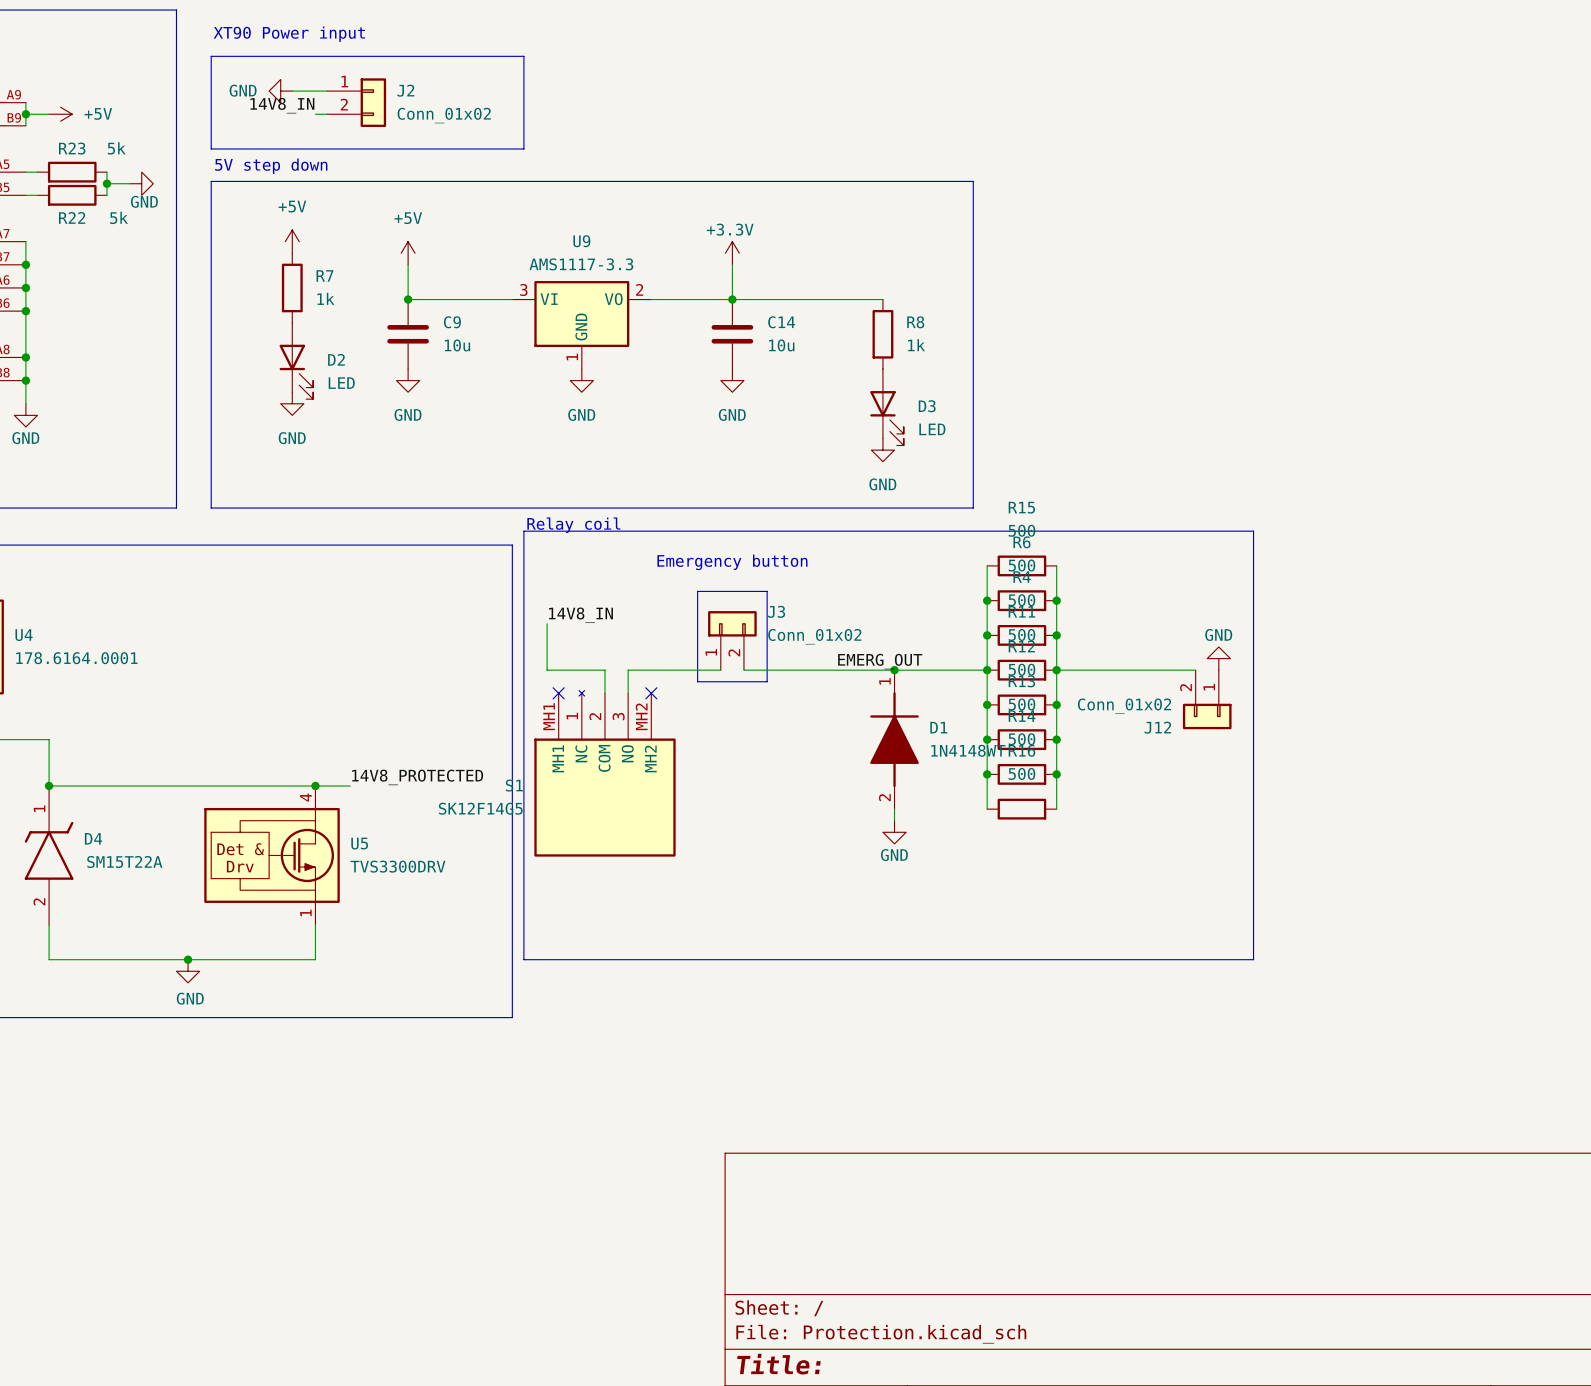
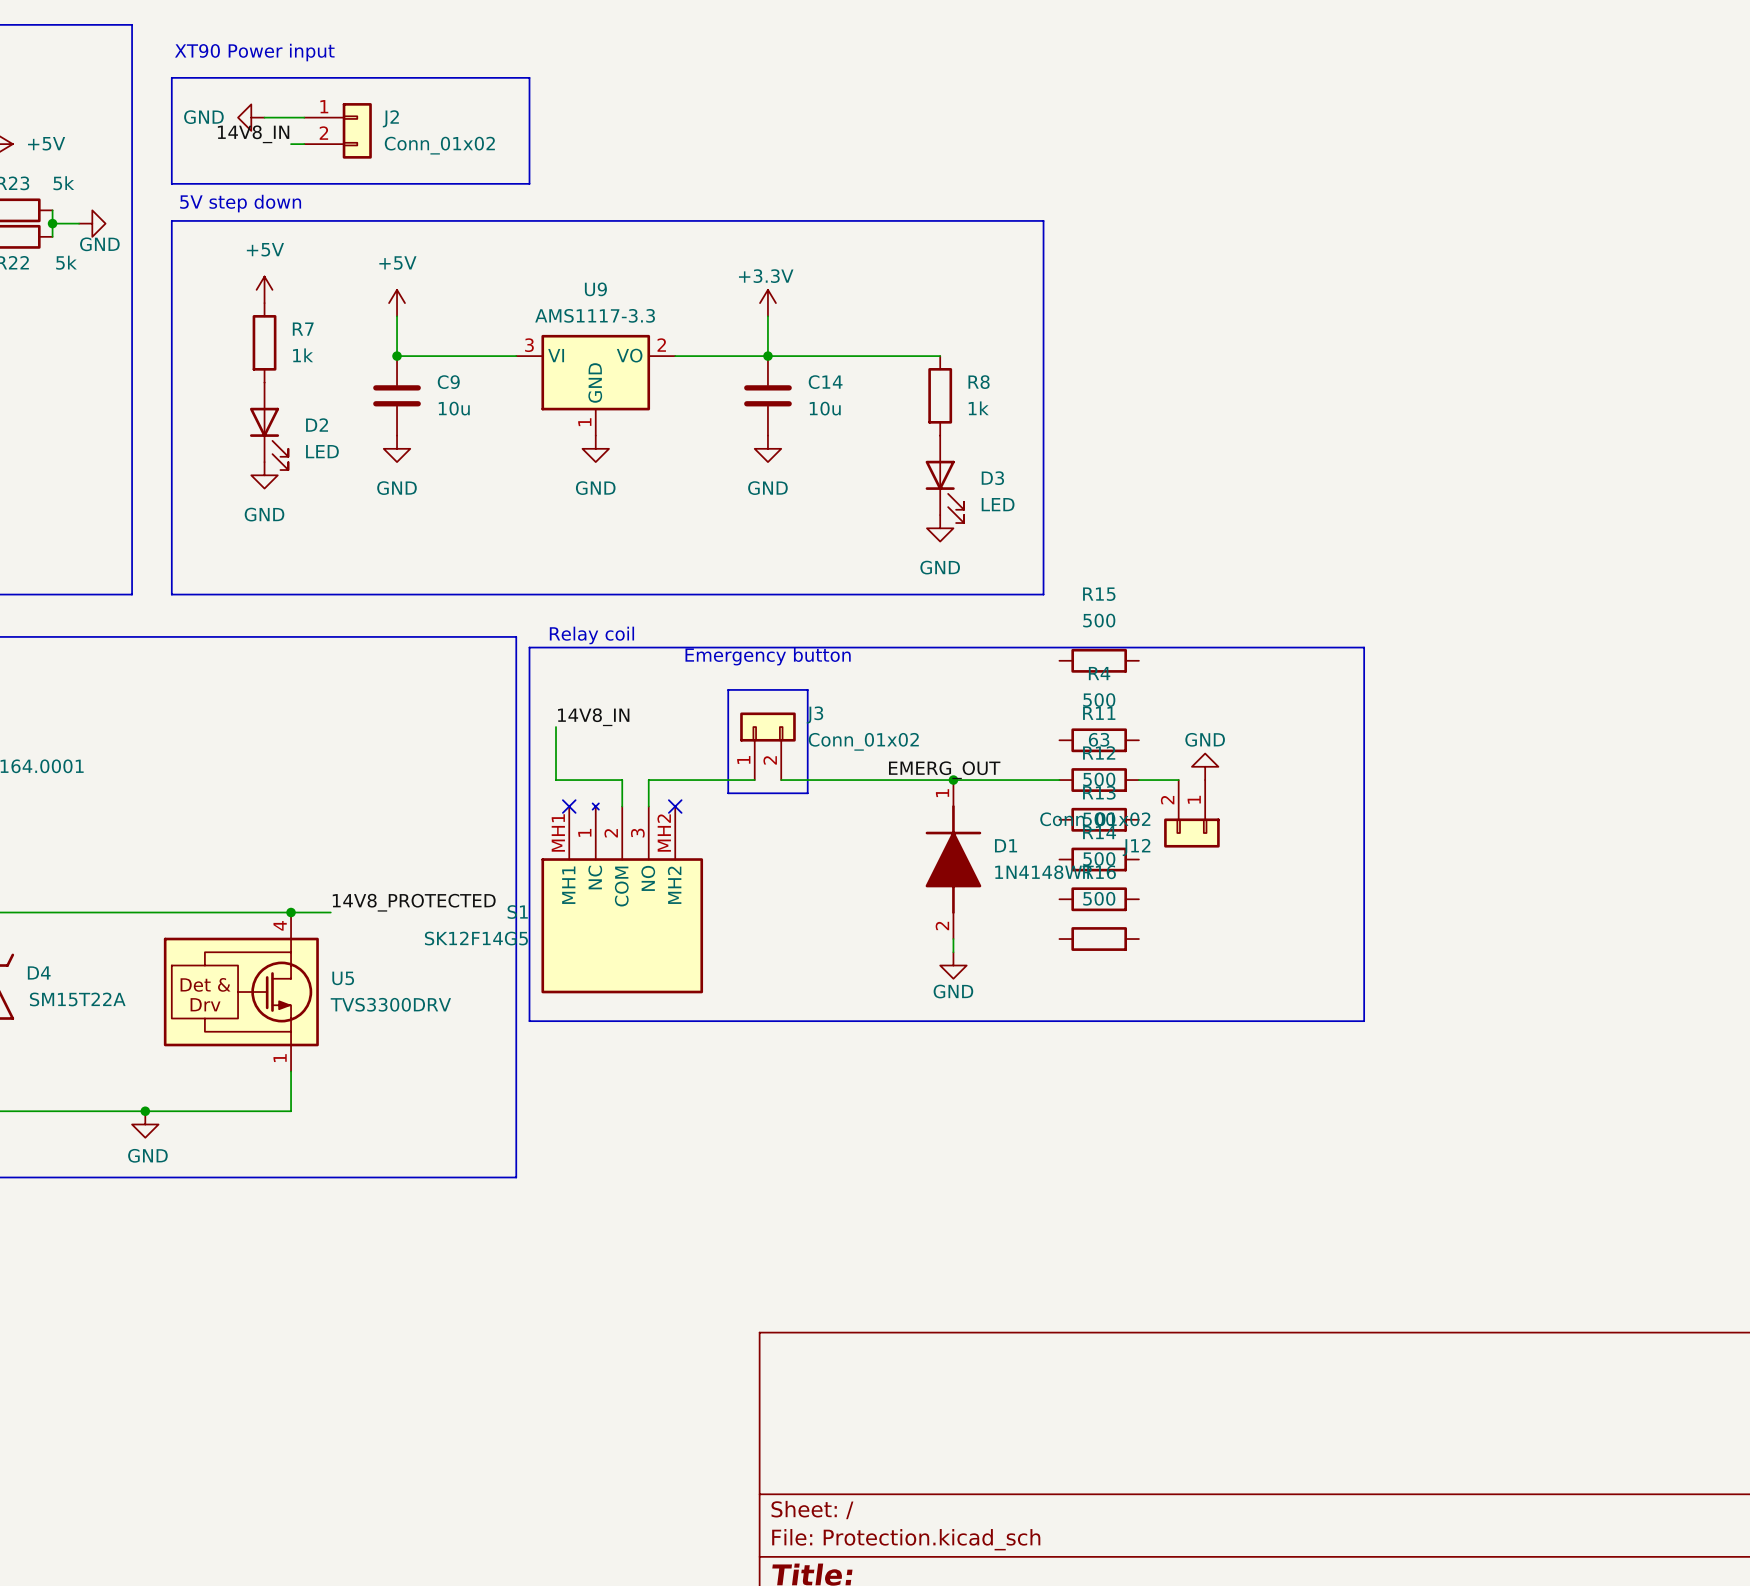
text position: Relay coil (573, 525) -> Relay coil (591, 635)
line: (523, 554) (523, 531) (1253, 531) (1253, 554) -> (529, 647) (1364, 647)
wire: (987, 565) (987, 809) -> none
wire: (1056, 565) (1056, 809) -> none
junction: (987, 600) -> none
R6: 500 (1021, 600) -> none
junction: (1056, 600) -> none
R11 value: 500 (1021, 634) -> 63 (1099, 739)
junction: (987, 635) -> none
junction: (1056, 635) -> none
power symbol position: GND (1218, 658) -> GND (1205, 766)
junction: (987, 670) -> none
junction: (1056, 670) -> none
wire: (1091, 670) (1195, 670) -> none
J12 position: (1207, 699) -> (1191, 813)
junction: (987, 704) -> none
junction: (1056, 704) -> none
junction: (987, 739) -> none
junction: (1056, 739) -> none
junction: (987, 774) -> none
junction: (1056, 774) -> none
line: (523, 880) (523, 959) (1253, 959) (1253, 880) -> (529, 1021) (1364, 1021)

